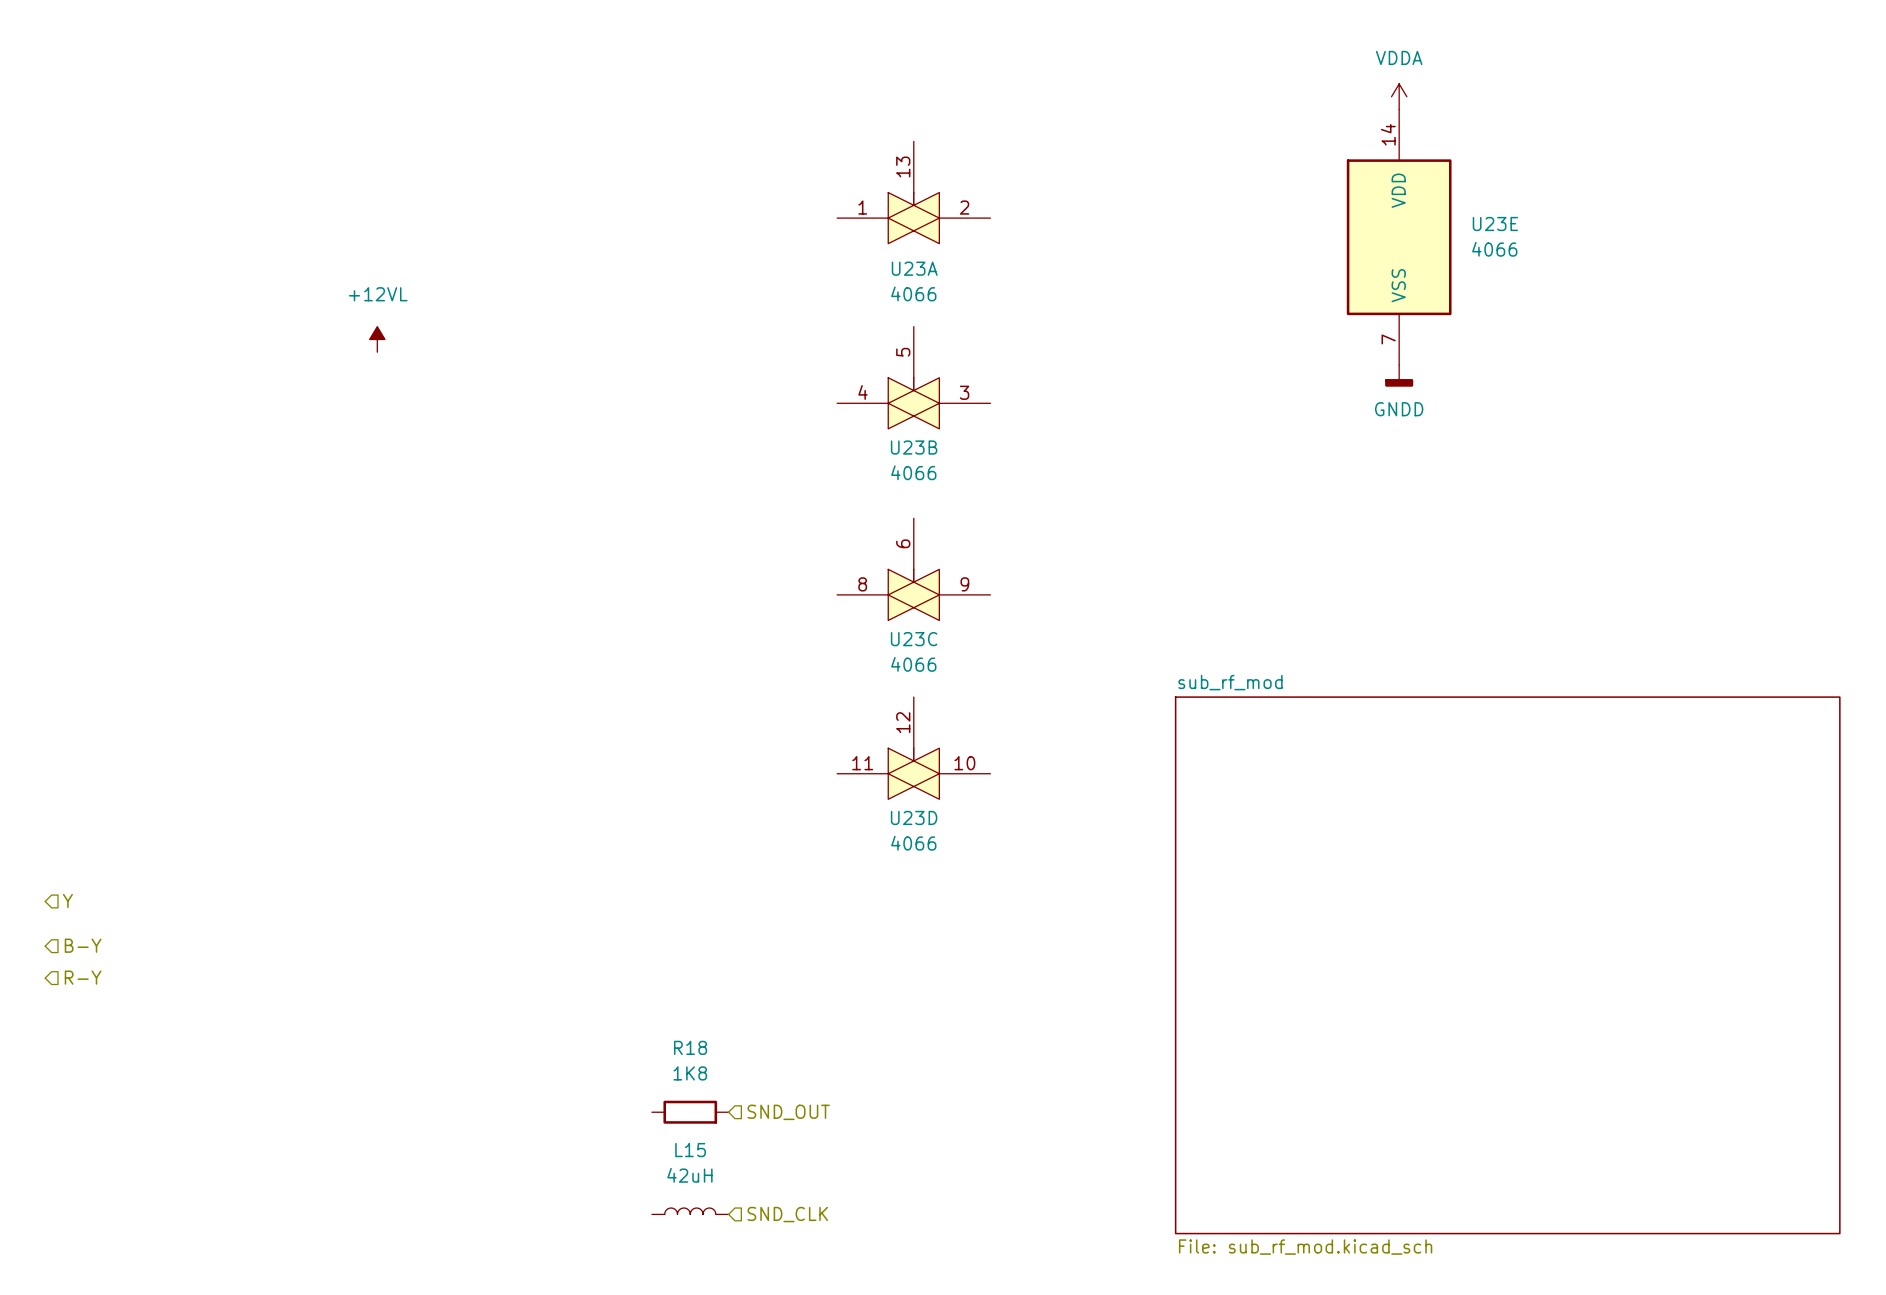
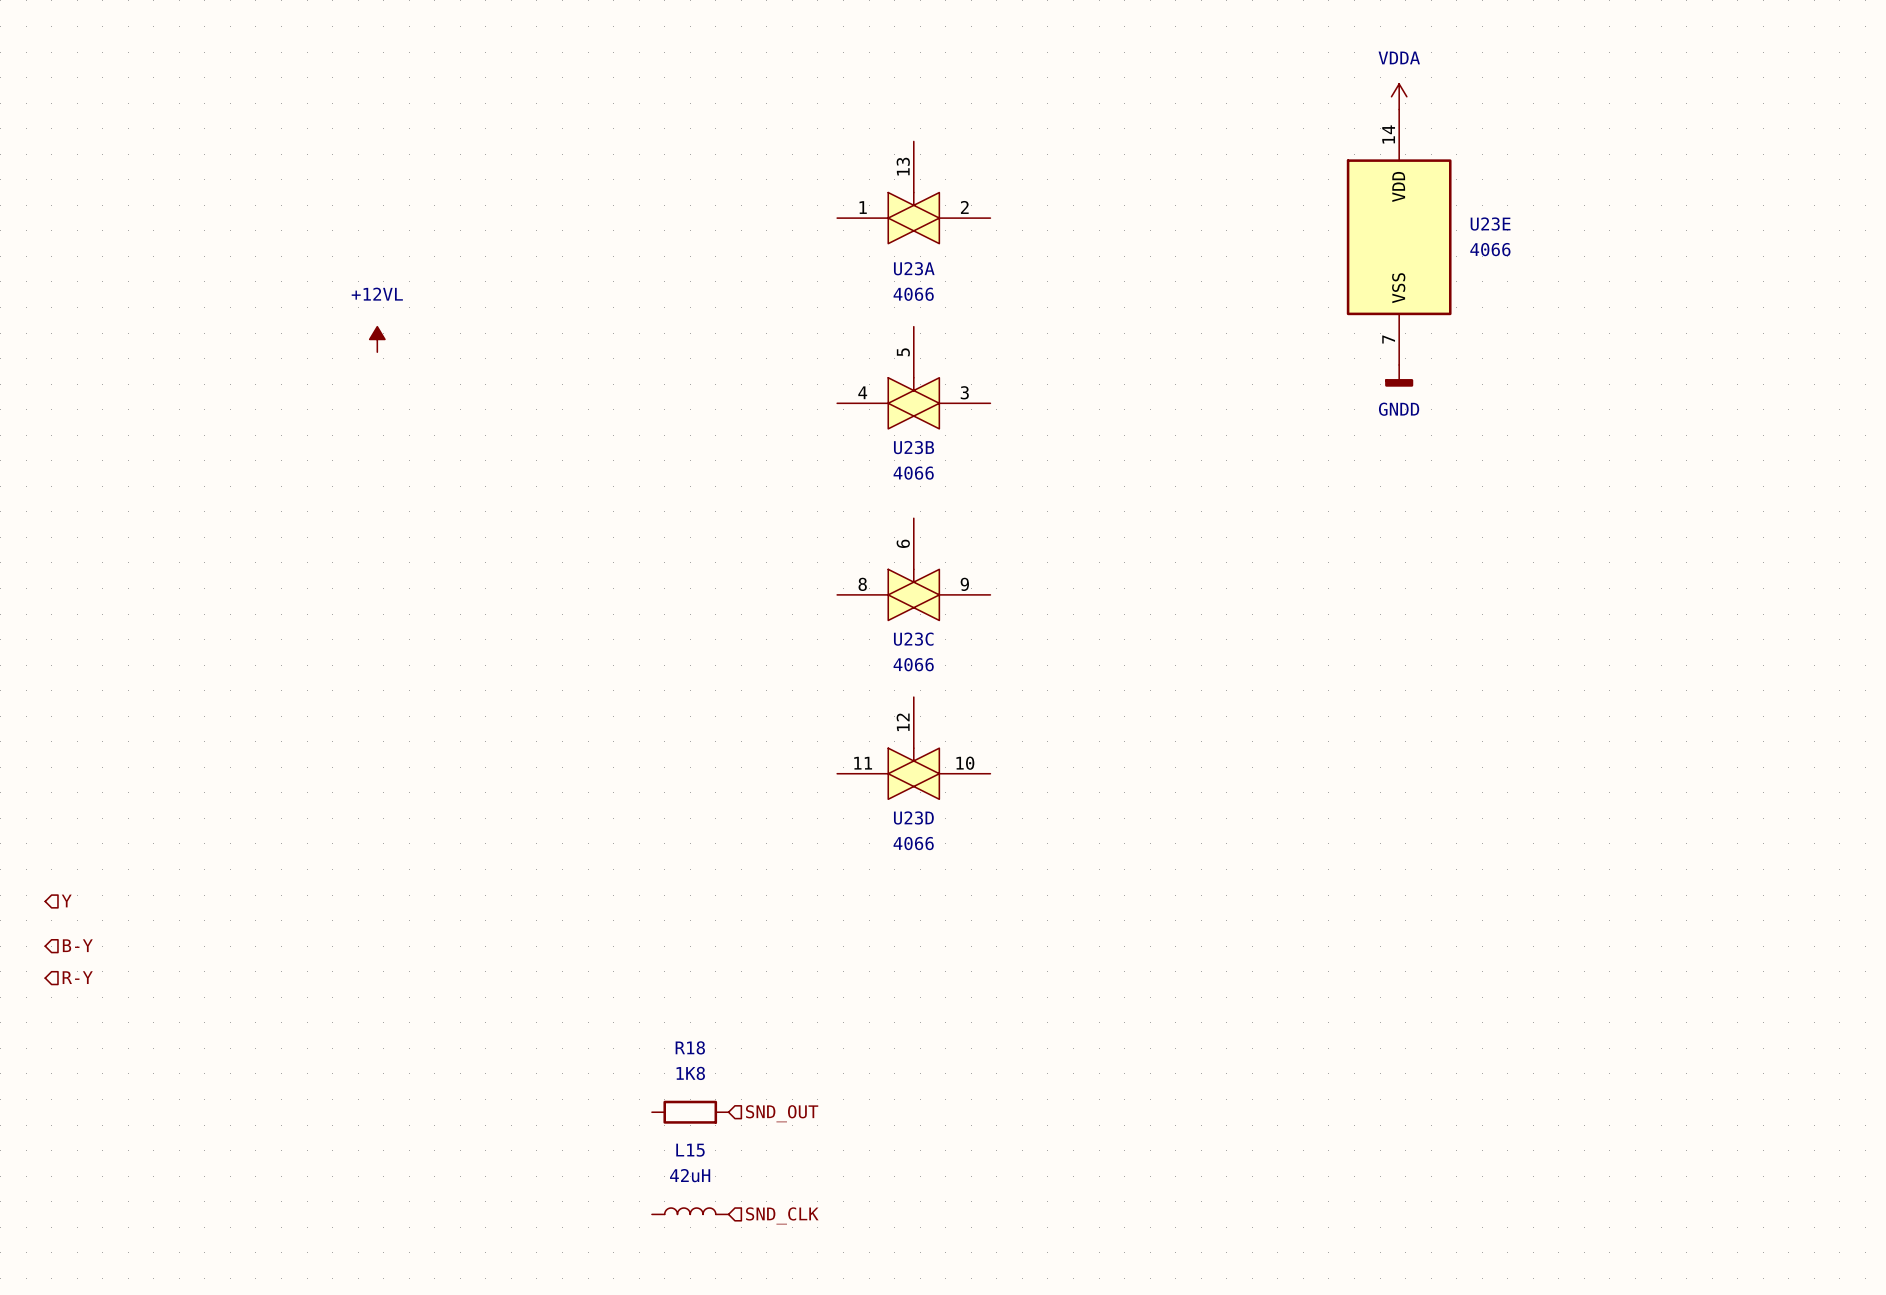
sheet sub_rf_mod: File: sub_rf_mod.kicad_sch (1507, 965) -> none

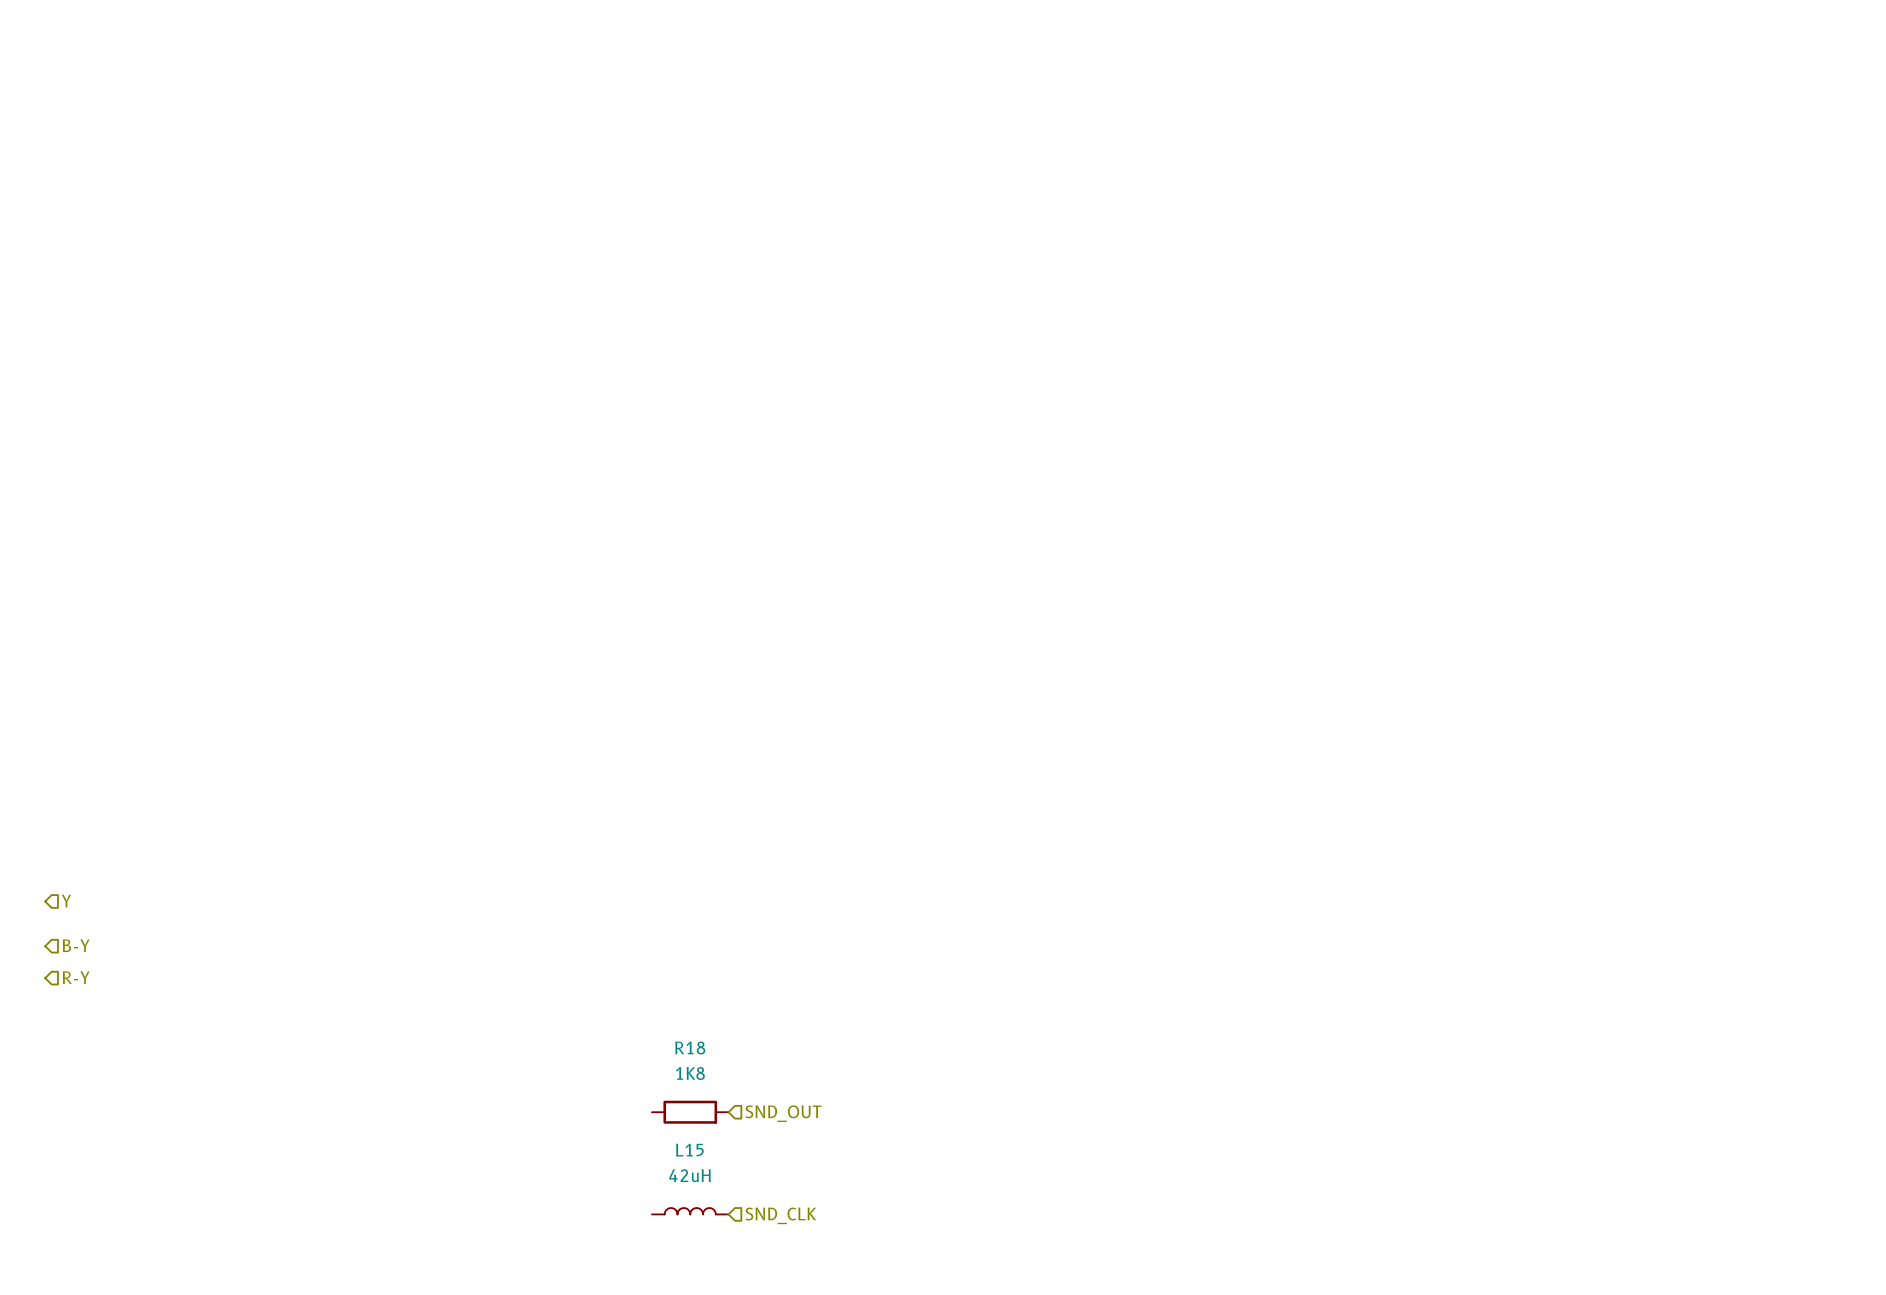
power symbol: VDDA (1399, 96) -> none
U23A: 4066 (913, 192) -> none
U23E: 4066 (1399, 237) -> none
power symbol: +12VL (377, 339) -> none
power symbol: GNDD (1399, 375) -> none
U23B: 4066 (913, 377) -> none
U23C: 4066 (913, 569) -> none
U23D: 4066 (913, 748) -> none

